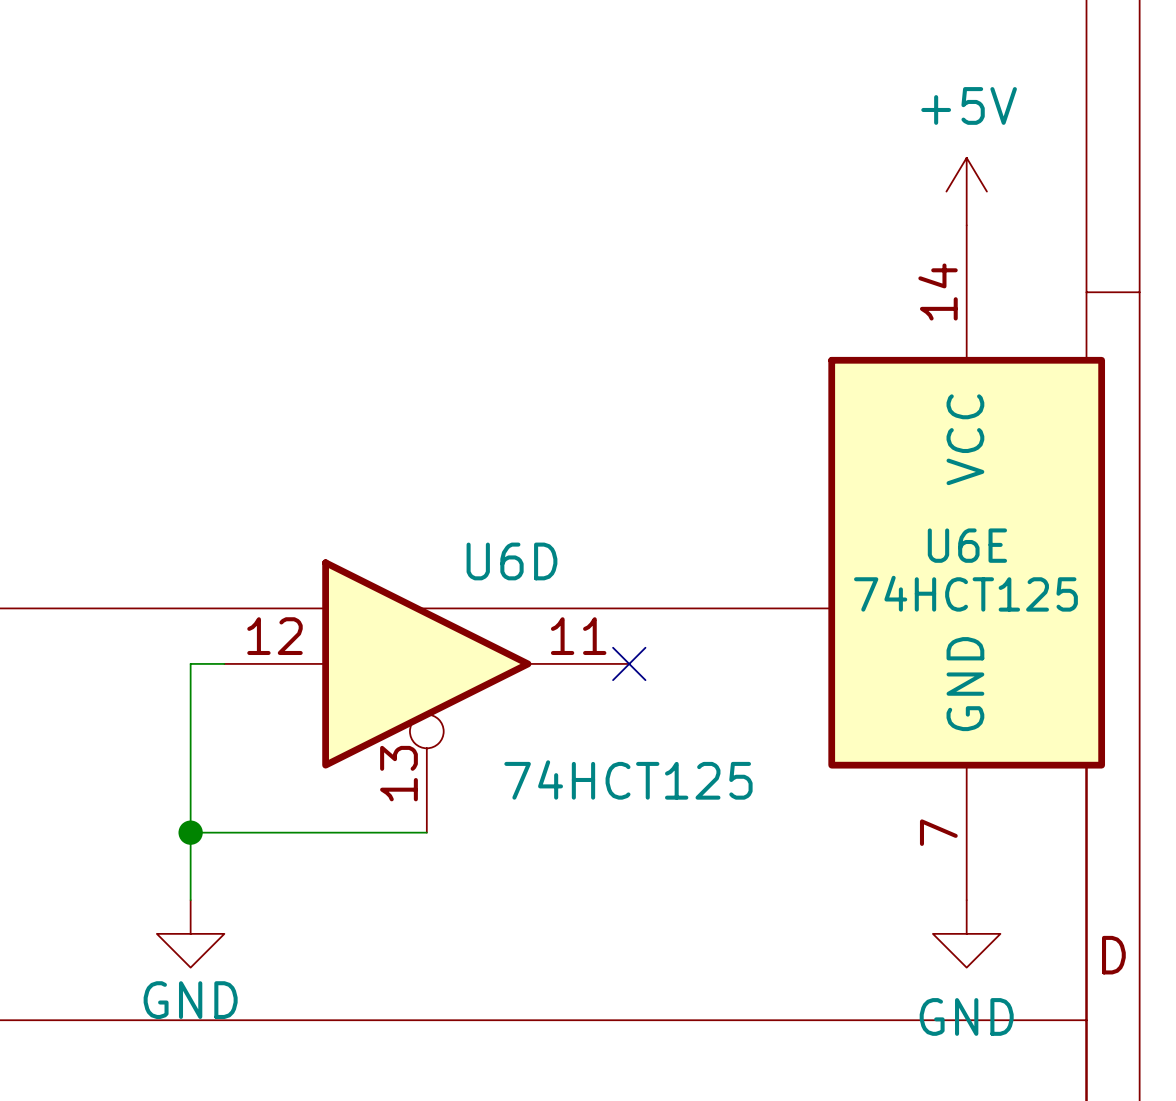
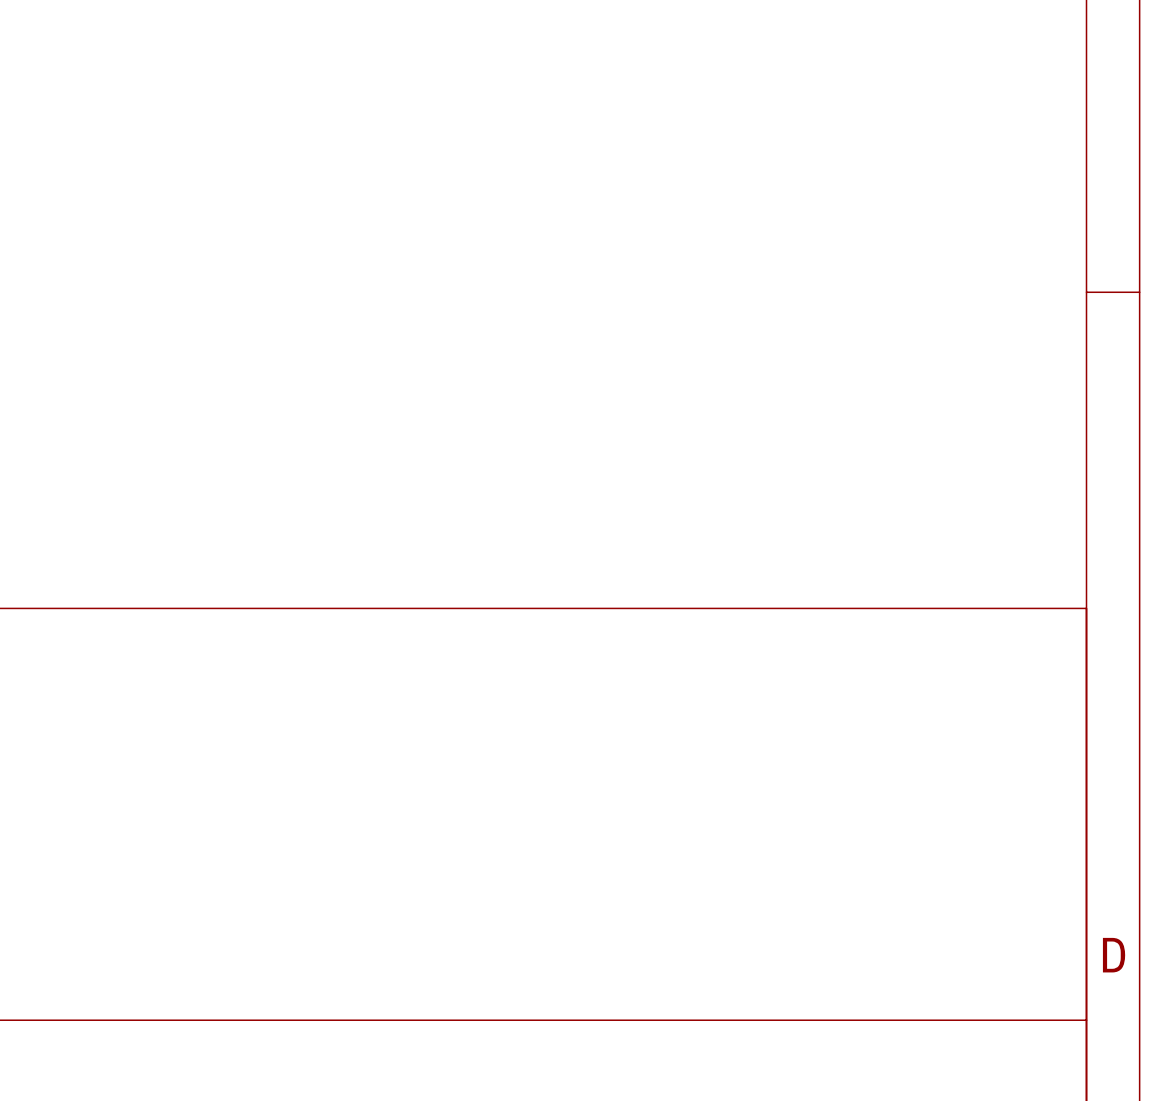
power symbol: +5V (966, 191) -> none
U6E: 74HCT125 (966, 562) -> none
wire: (224, 663) (190, 663) (190, 900) -> none
no-connect mark: (629, 663) -> none
U6D: 74HCT125 (426, 696) -> none
wire: (190, 832) (426, 832) -> none
junction: (190, 832) -> none
power symbol: GND (190, 933) -> none
power symbol: GND (966, 933) -> none

